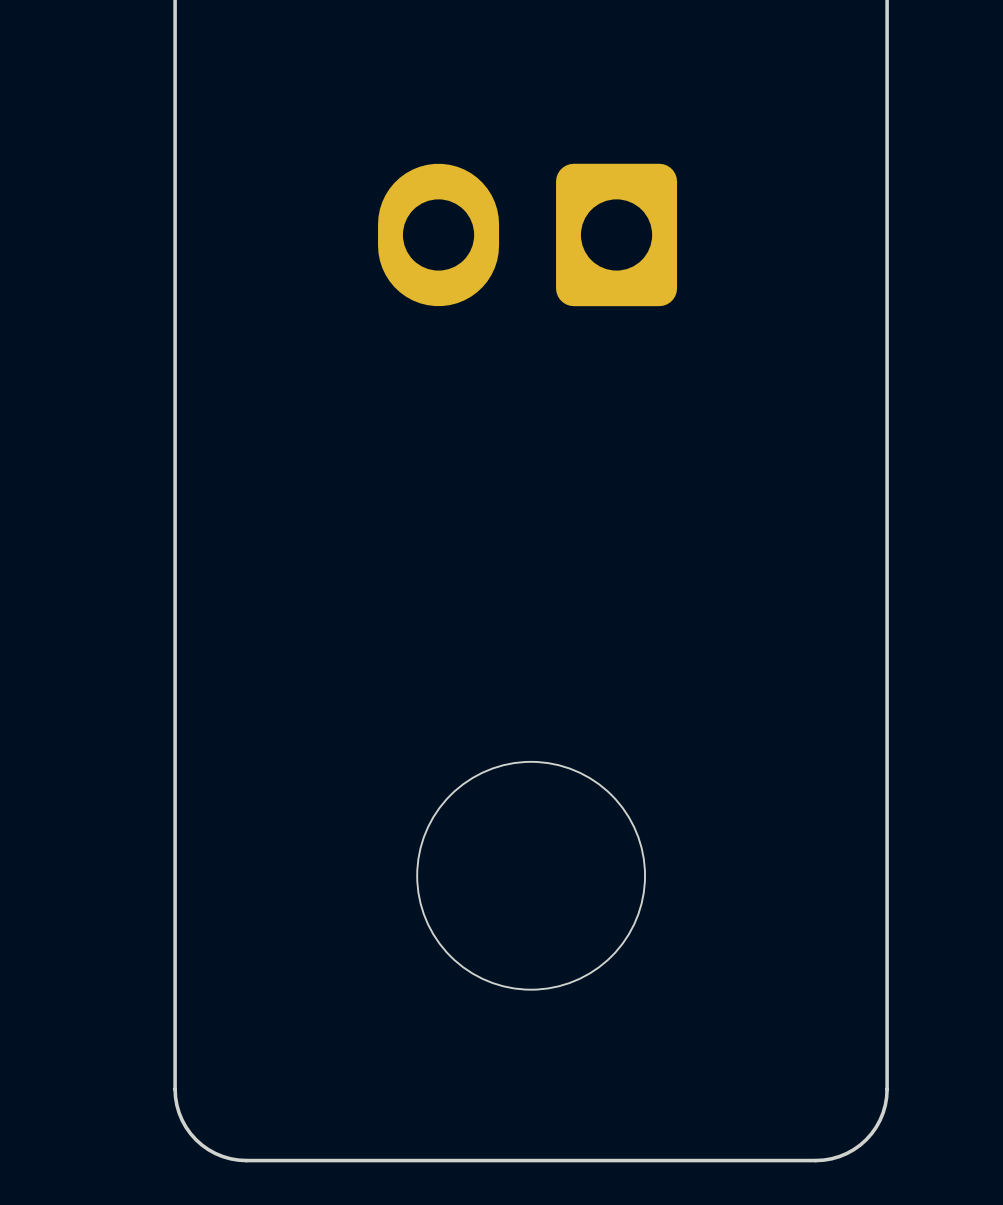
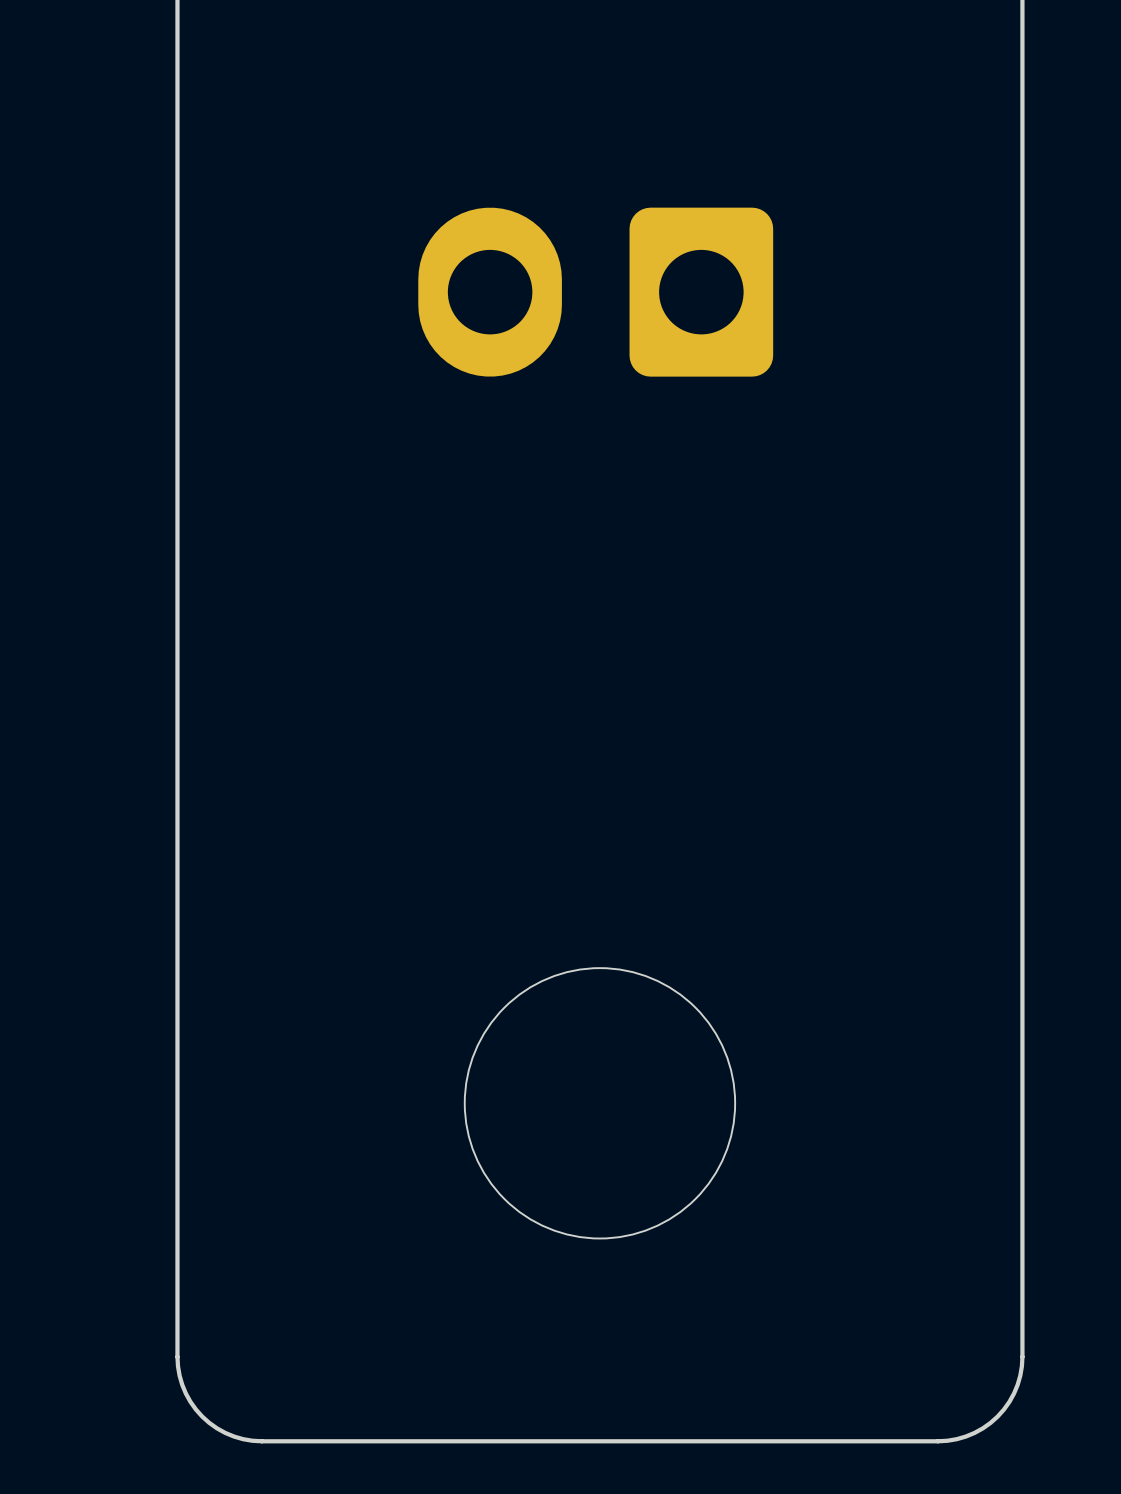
part position: (527, 234) -> (595, 292)

